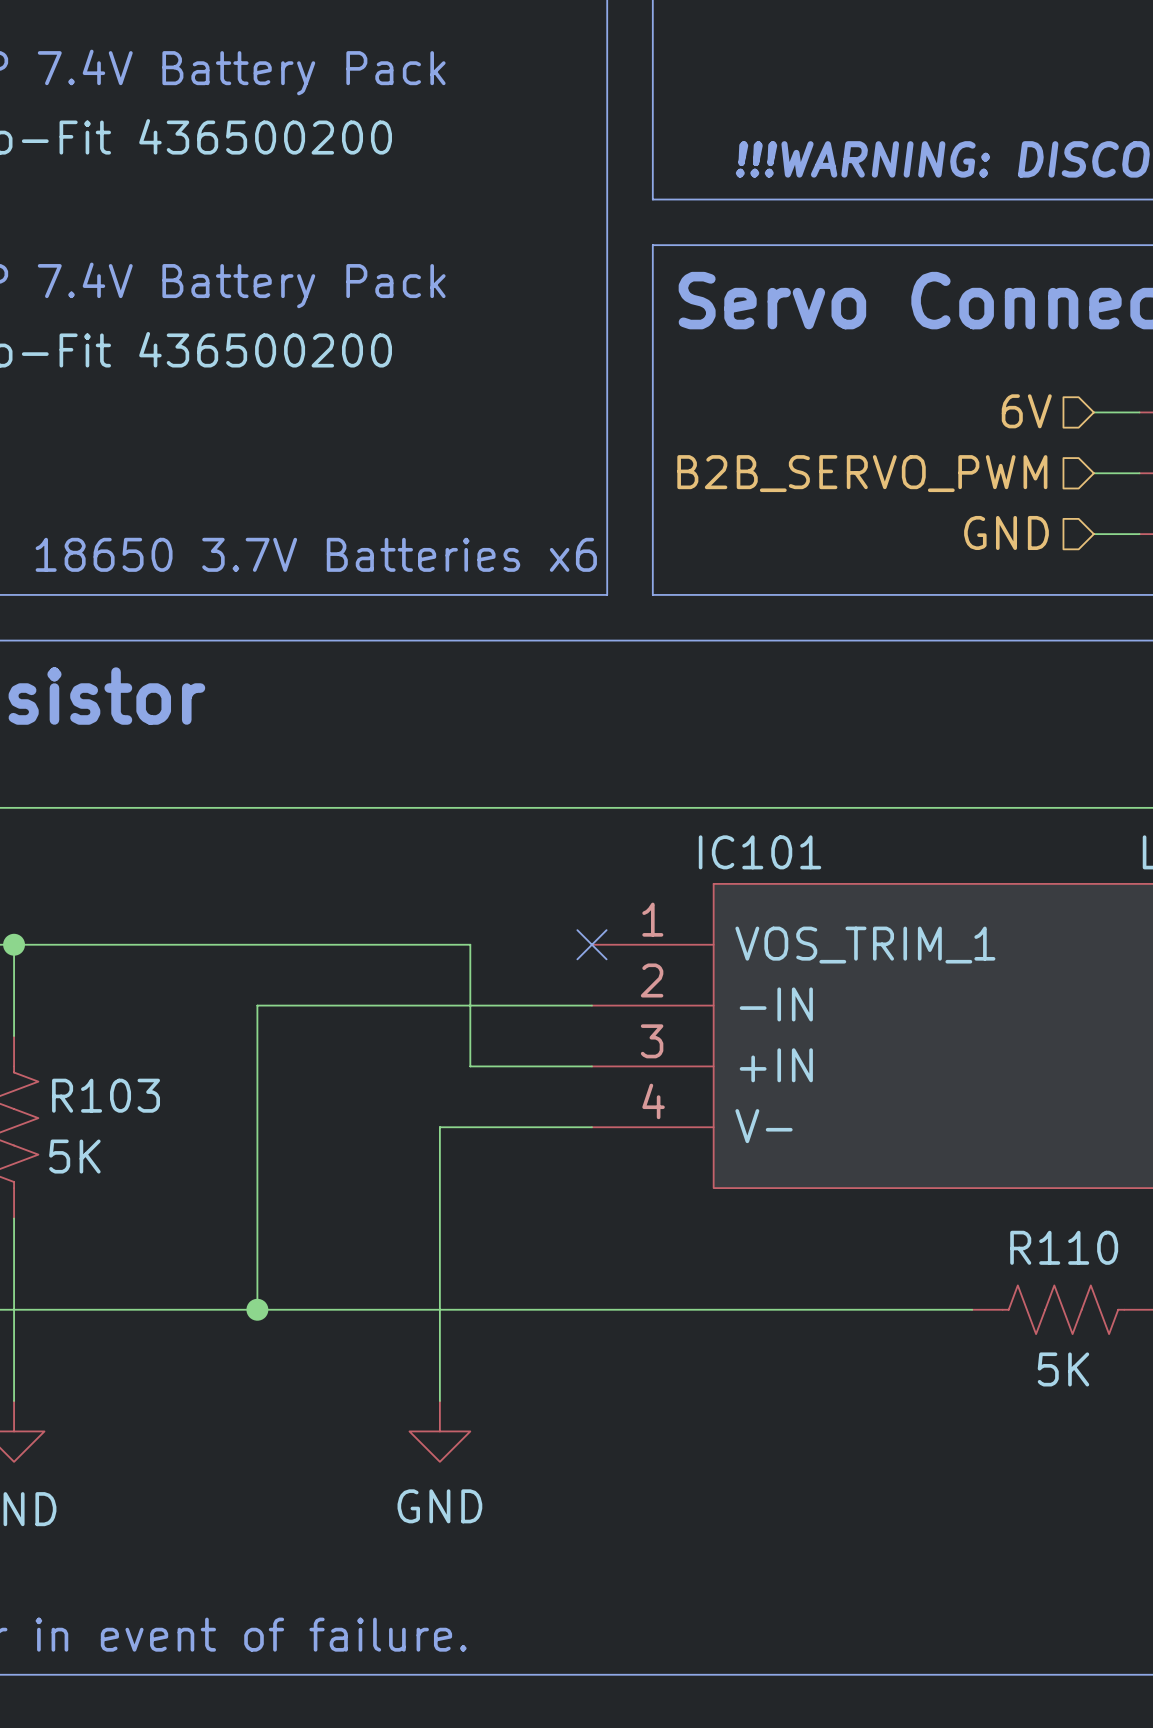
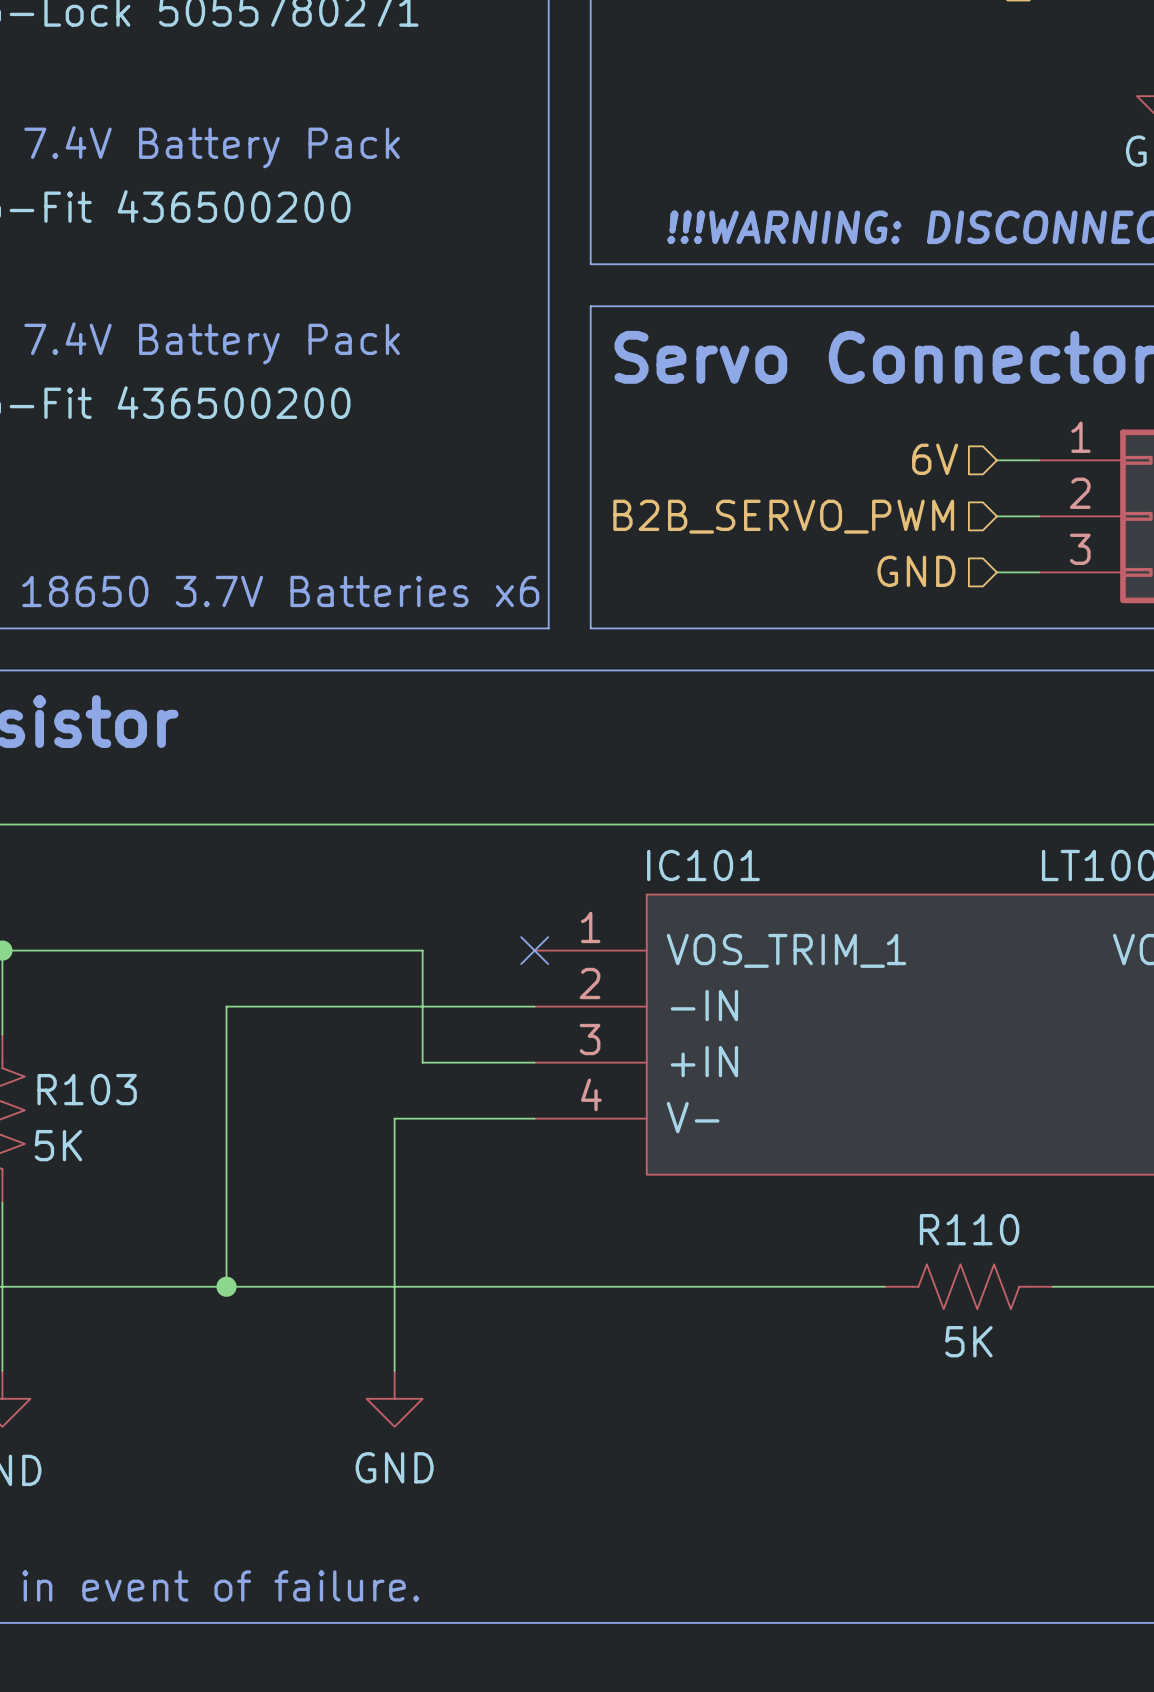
IC101 name position: IC101 (760, 852) -> IC101 (703, 865)

